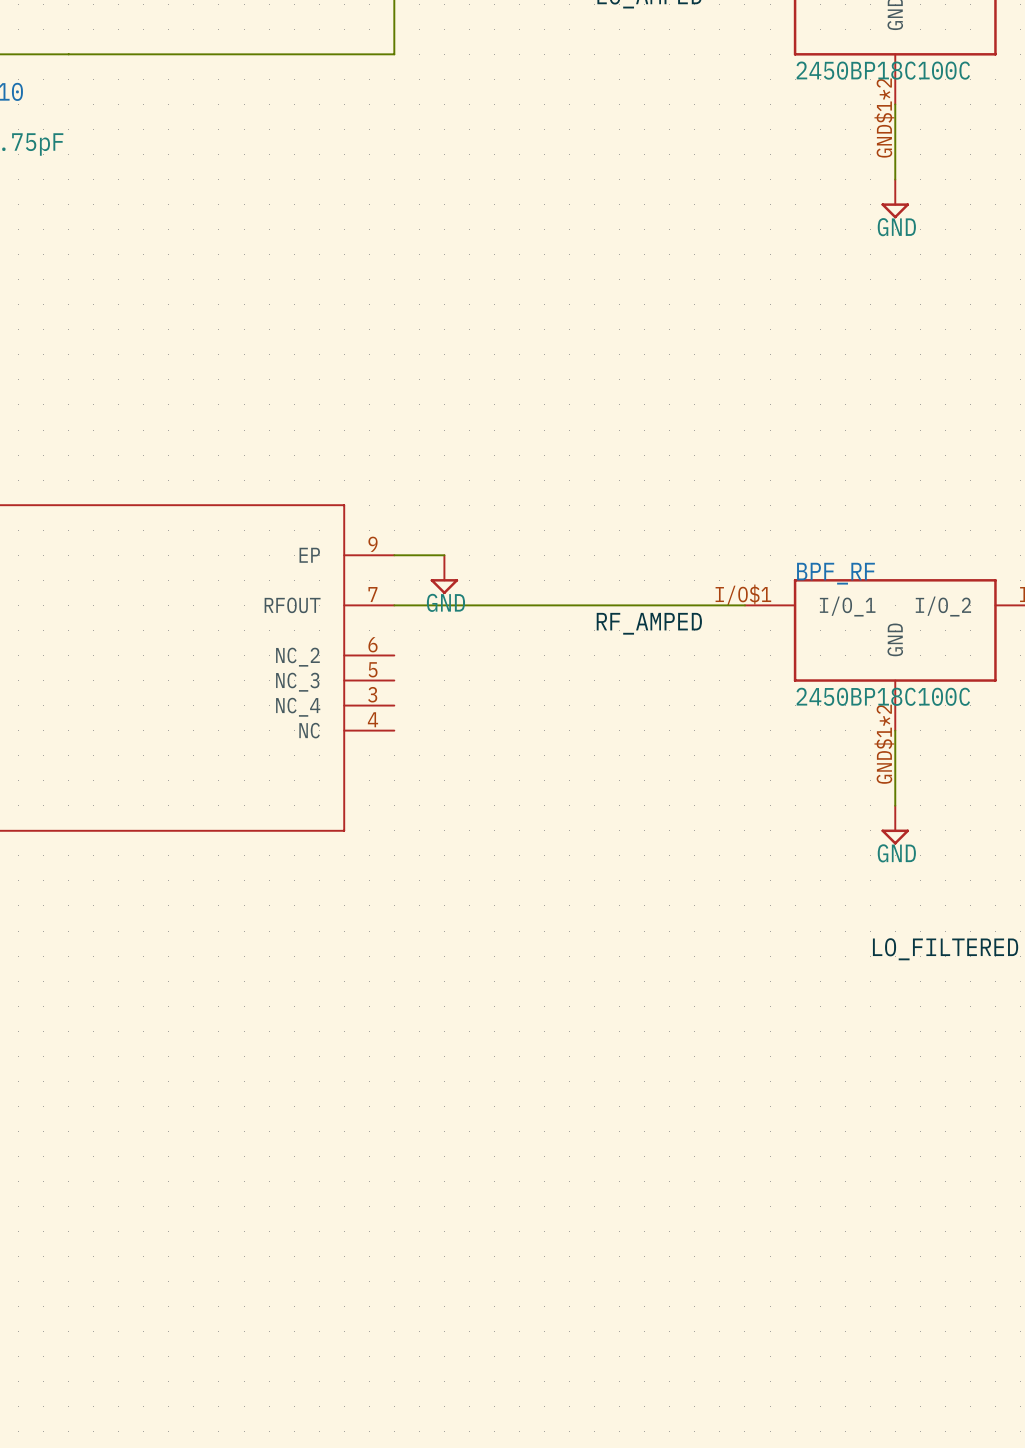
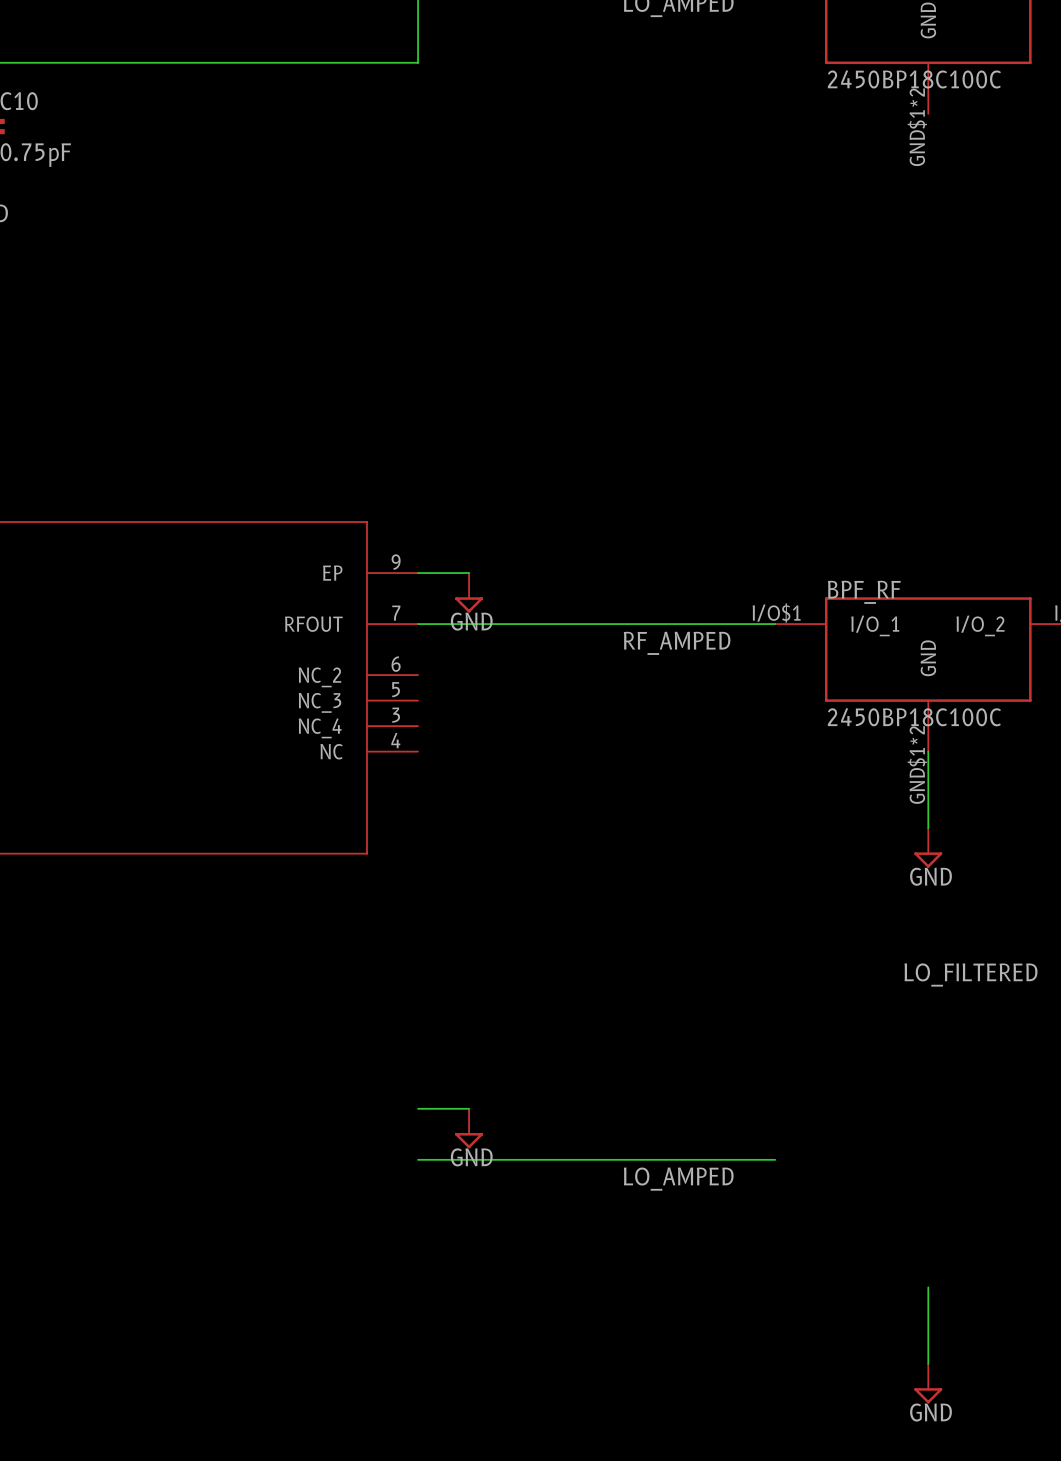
wire: (895, 104) (895, 179) -> none
power symbol: GND (895, 198) -> none
wire: none -> (418, 1108) (469, 1108)
power symbol: none -> GND (469, 1128)
wire: none -> (418, 1159) (775, 1159)
label: none -> LO_AMPED (678, 1179)
wire: none -> (928, 1287) (928, 1363)
power symbol: none -> GND (928, 1383)

